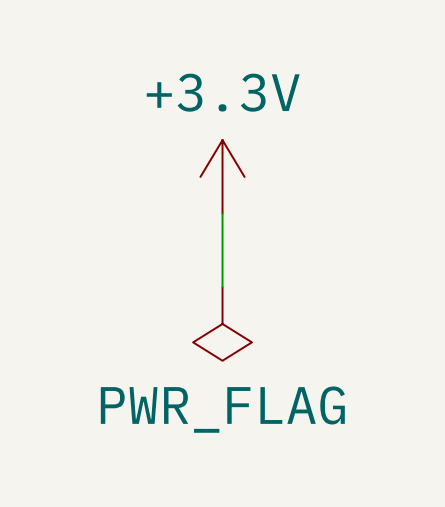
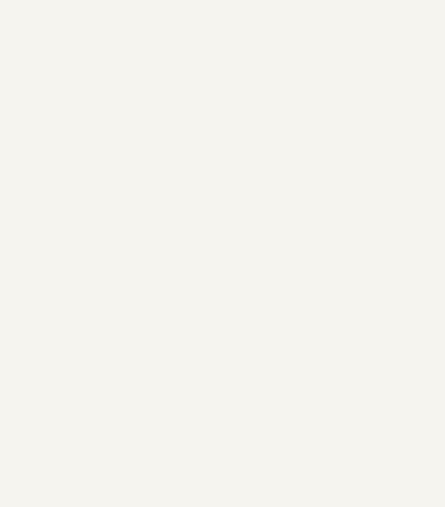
power symbol: +3.3V (222, 176) -> none
wire: (222, 213) (222, 287) -> none
power symbol: PWR_FLAG (222, 323) -> none

